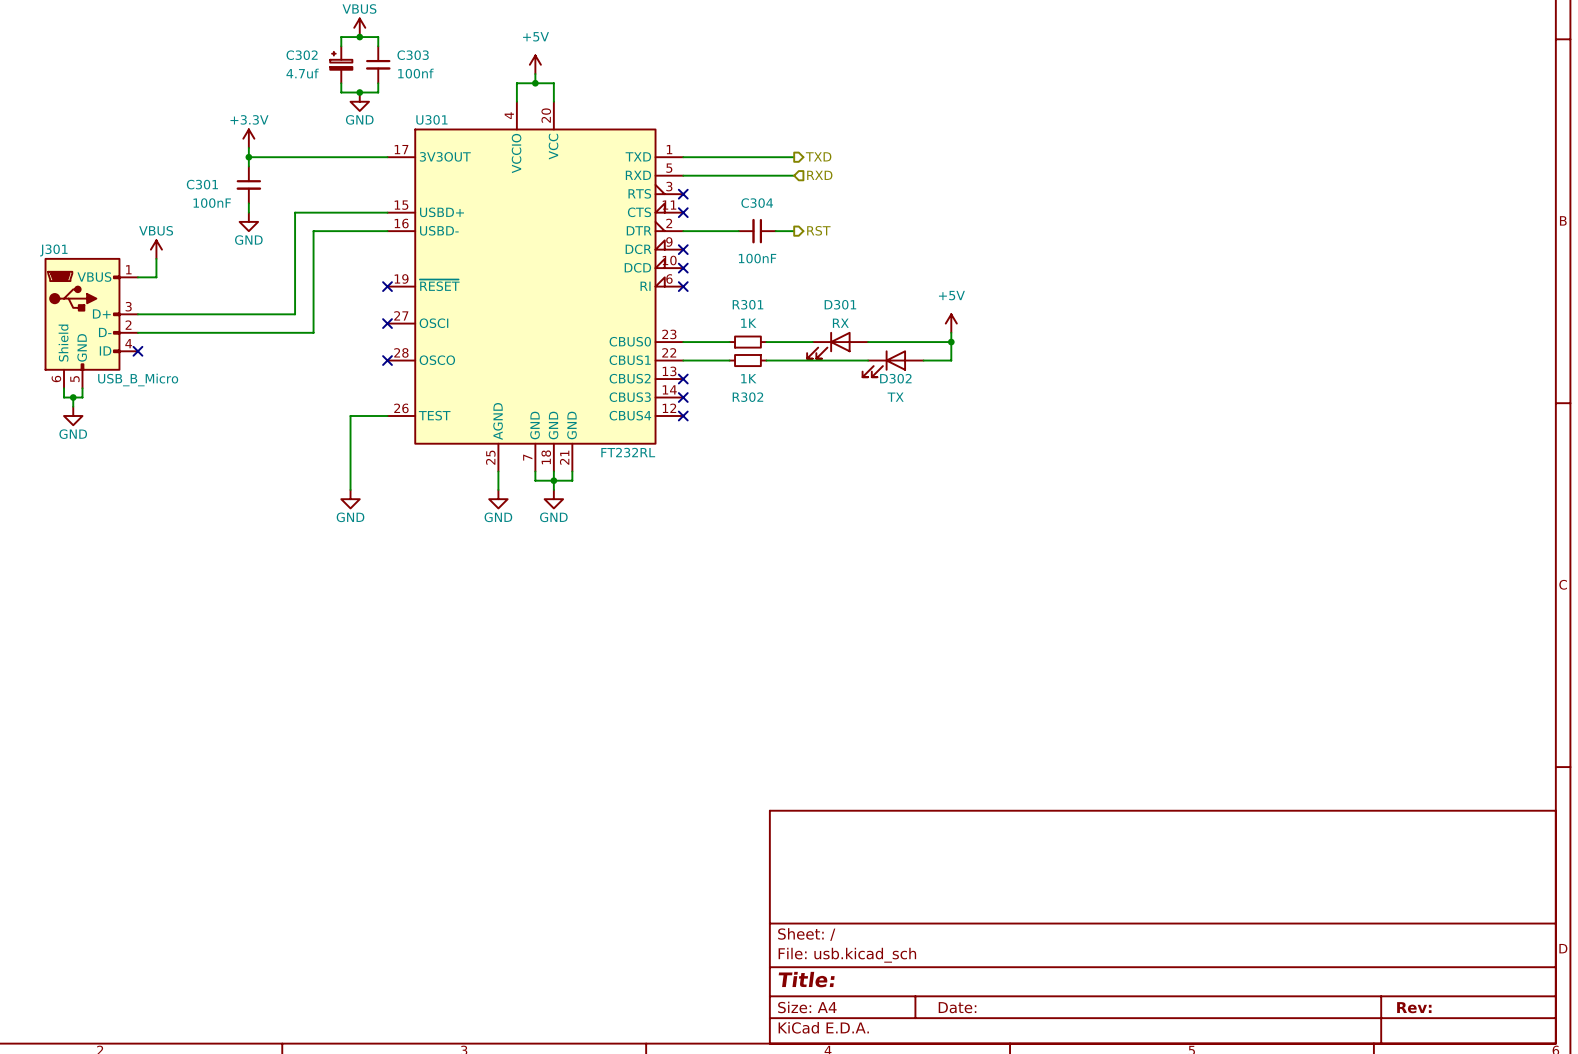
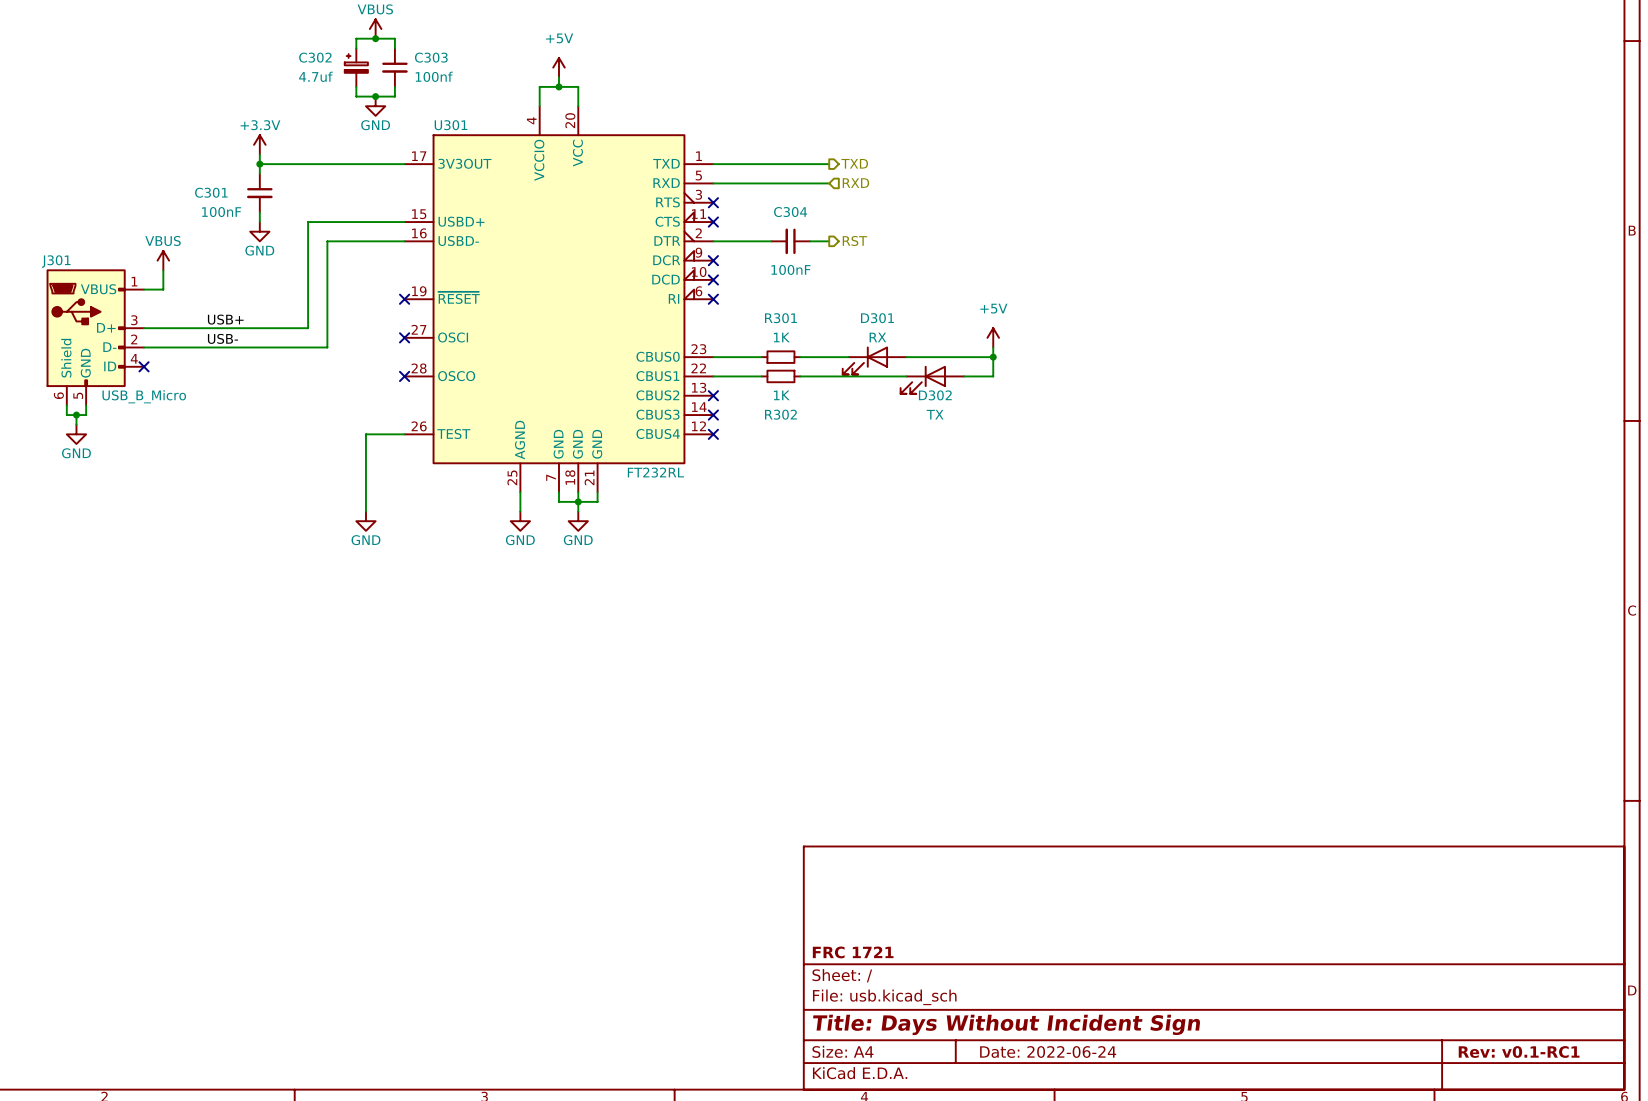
label: none -> USB+ (225, 319)
label: none -> USB- (222, 338)
title block: none -> FRC 1721 (853, 952)
title block: Title: (806, 979) -> Title: Days Without Incident Sign (1006, 1024)
title block: Date: (957, 1007) -> Date: 2022-06-24 (1048, 1051)
title block: Rev: (1414, 1007) -> Rev: v0.1-RC1 (1519, 1051)

